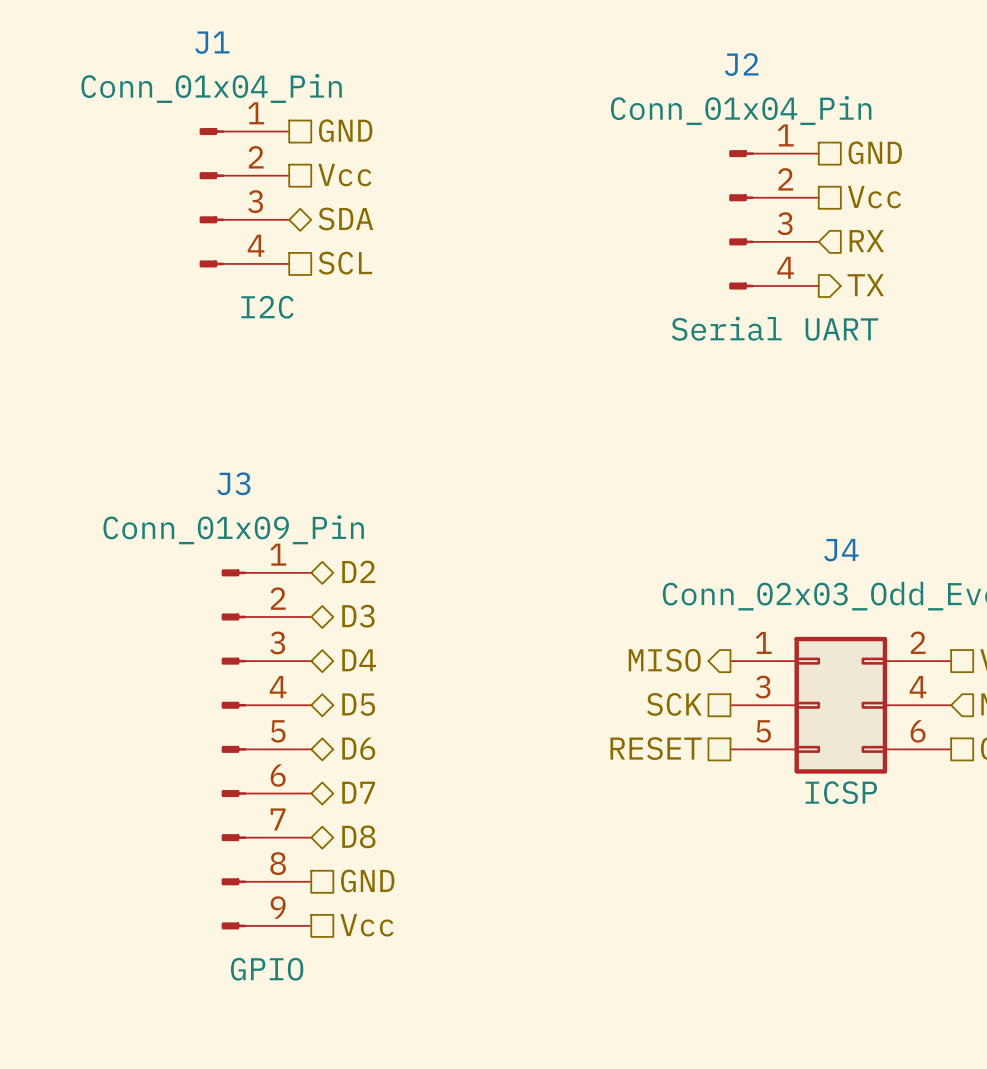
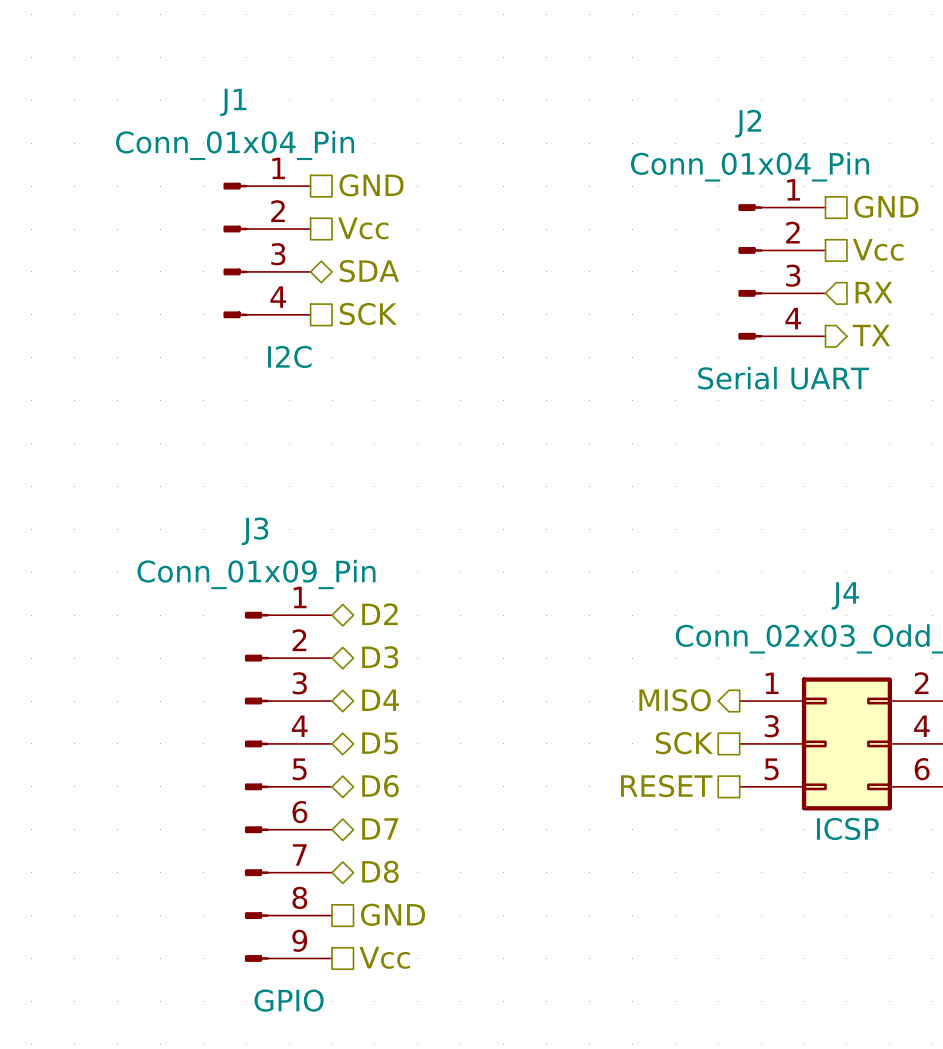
hierarchical label: SCL (345, 263) -> SCK (368, 314)

